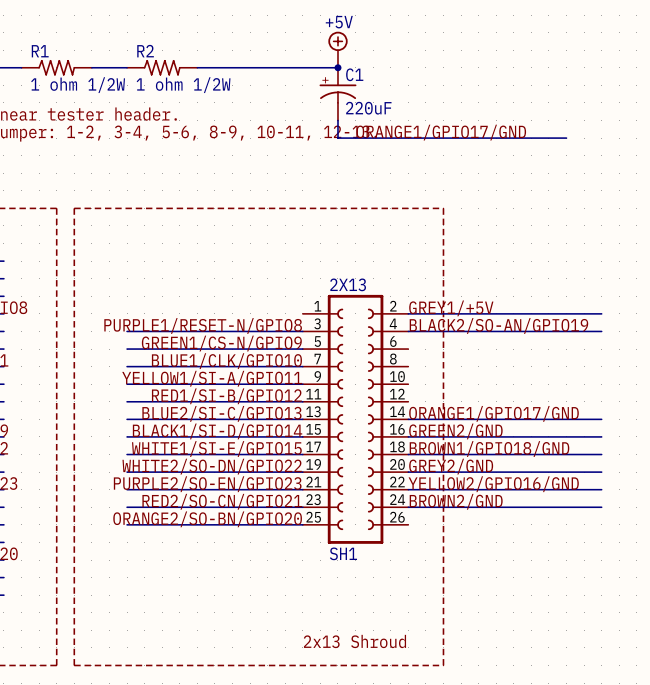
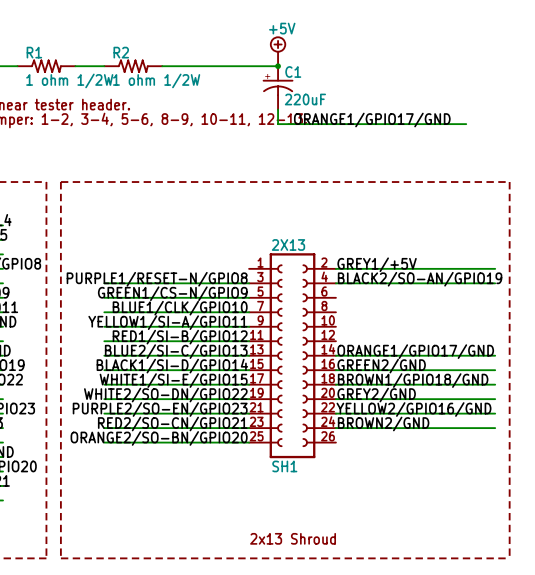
line: (443, 208) (443, 665) -> (364, 182) (509, 182) (509, 558) (364, 558)

